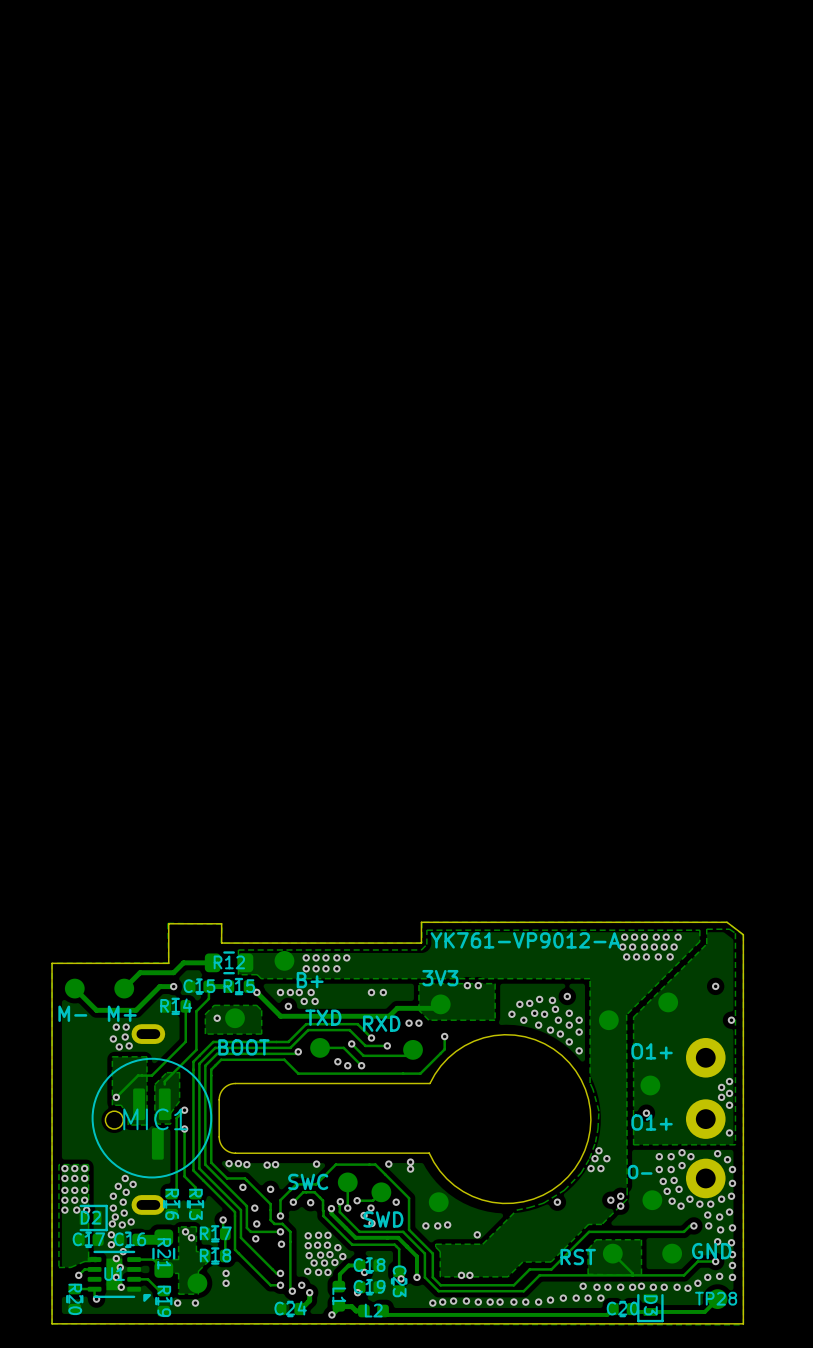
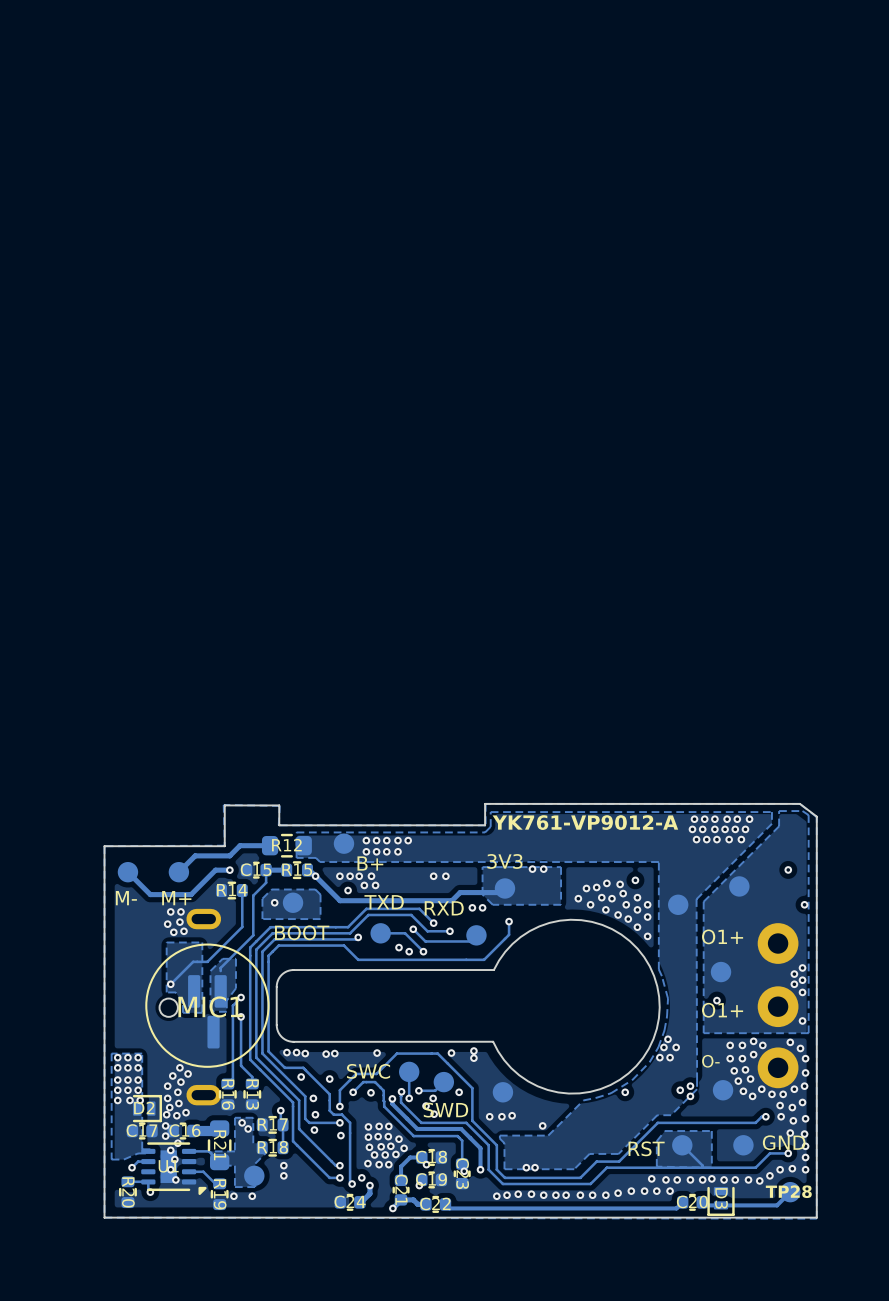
L1: (338, 1296) -> none
C21: none -> (401, 1190)
L2: (373, 1310) -> none
C22: none -> (435, 1204)

